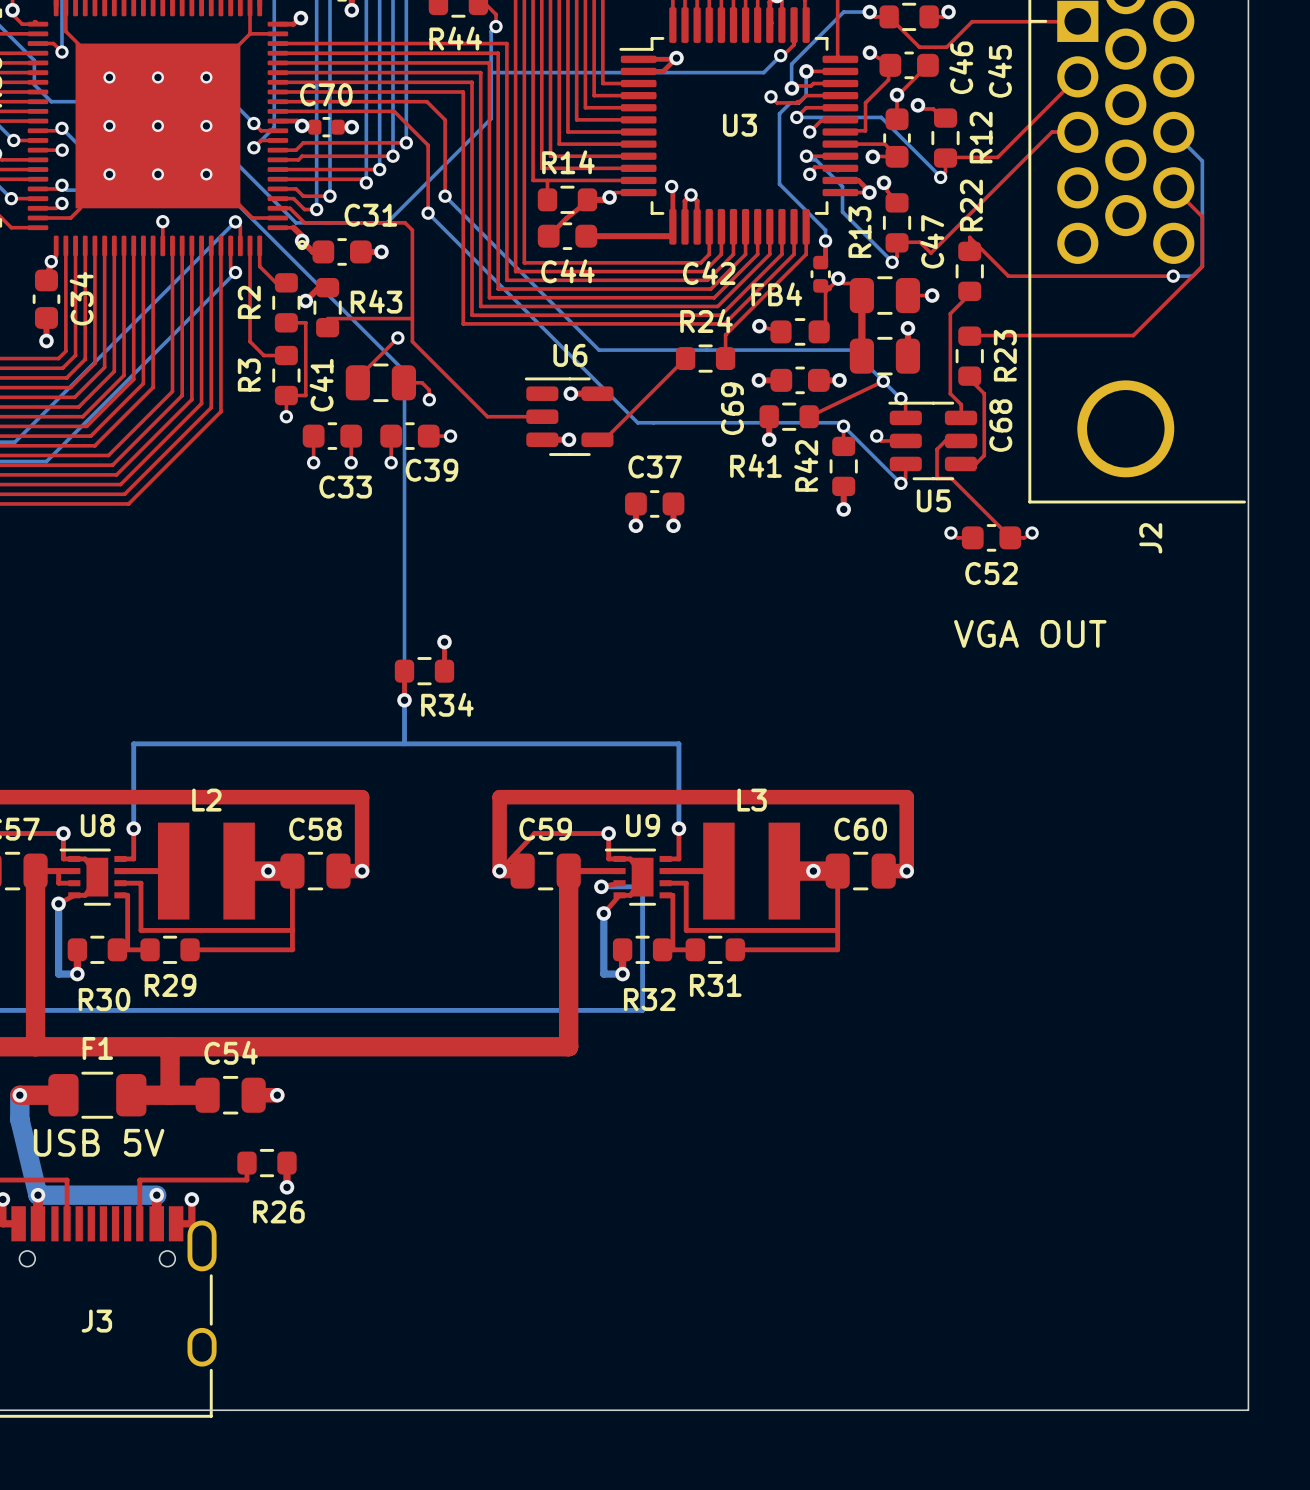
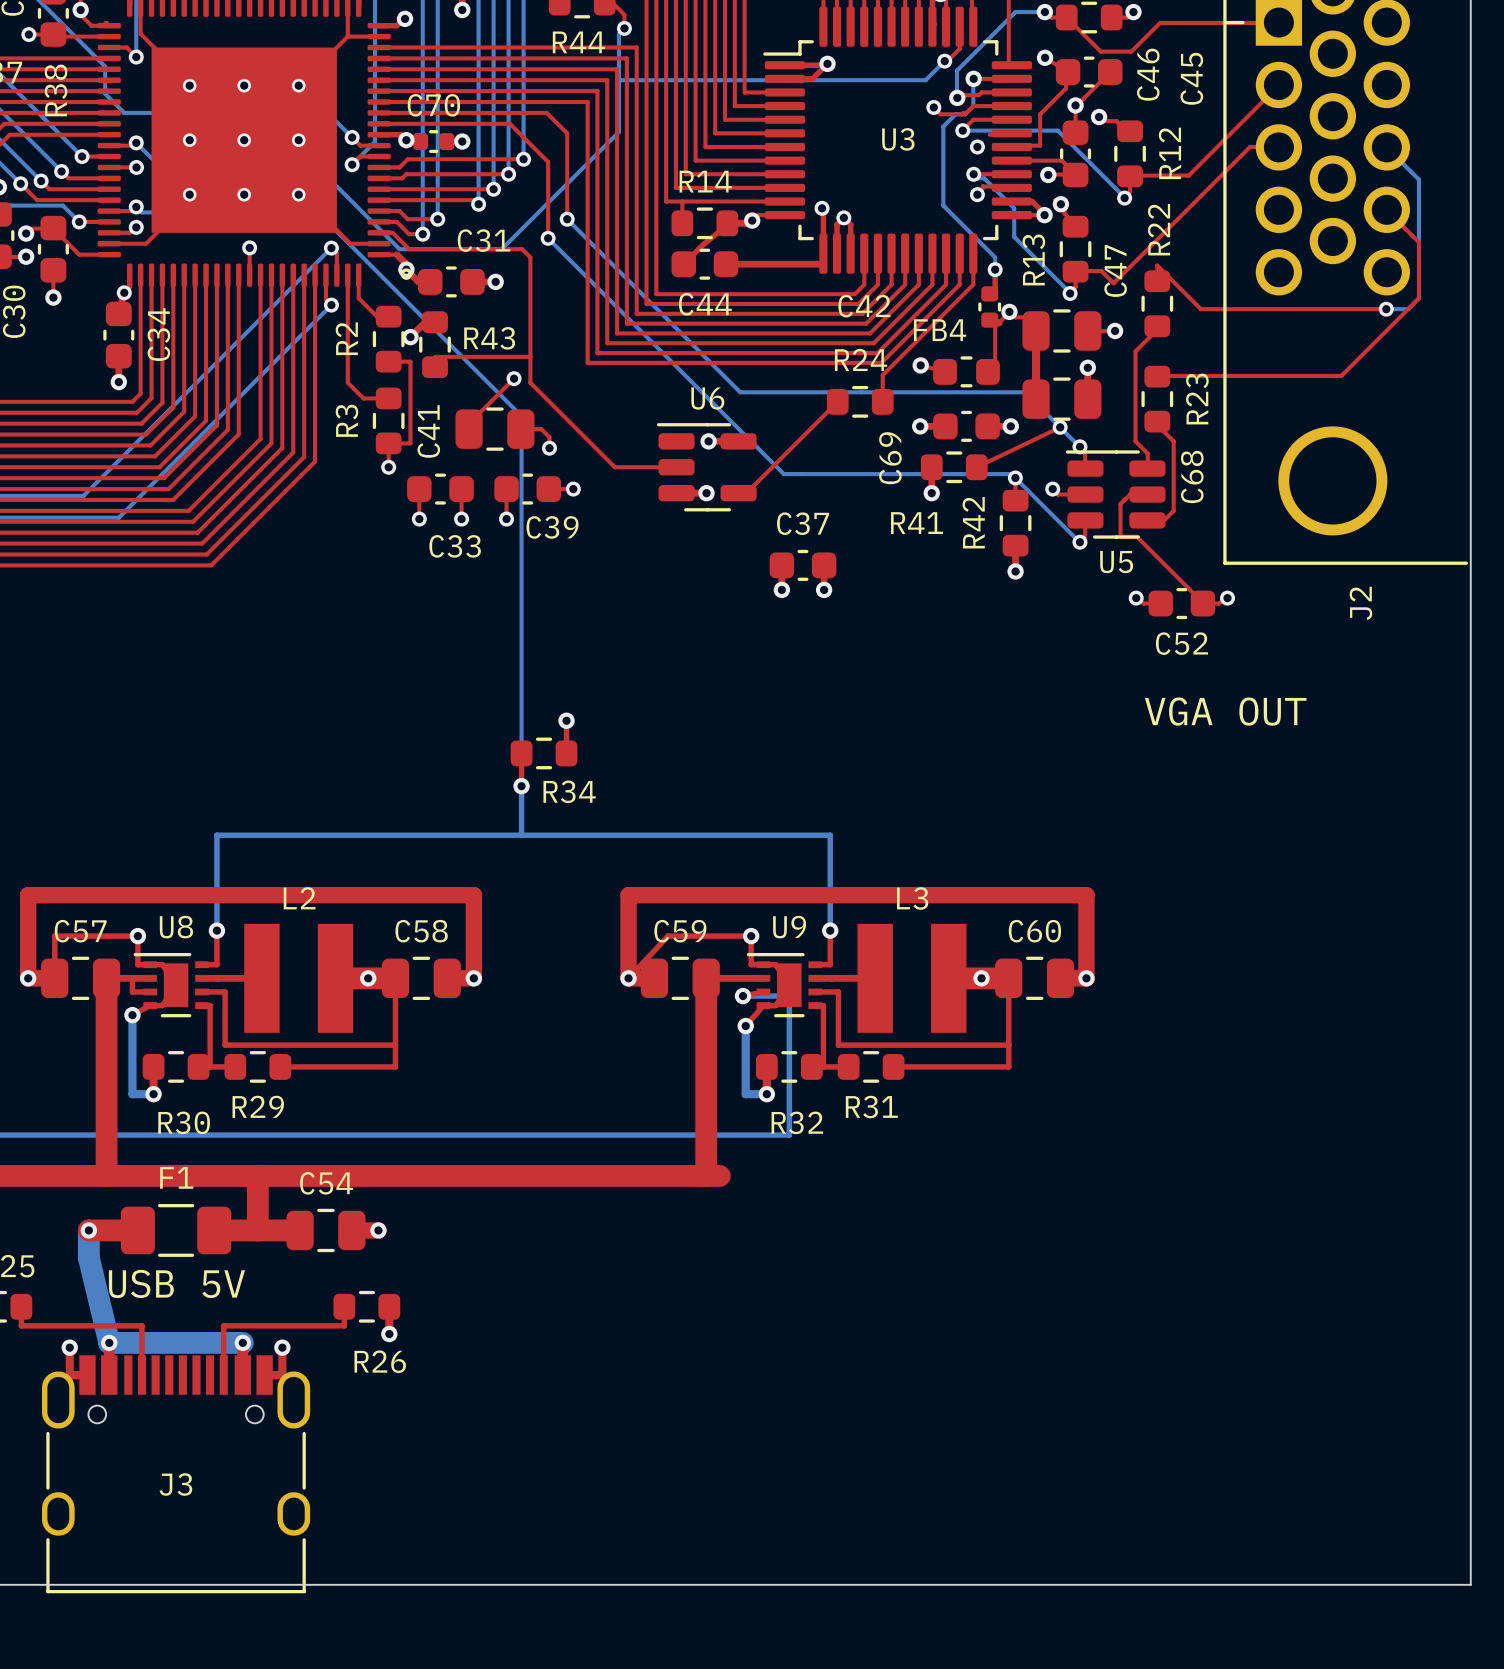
top track: (820, 121) (809, 131) -> none
top track: none -> (706, 1175) (719, 1175)

